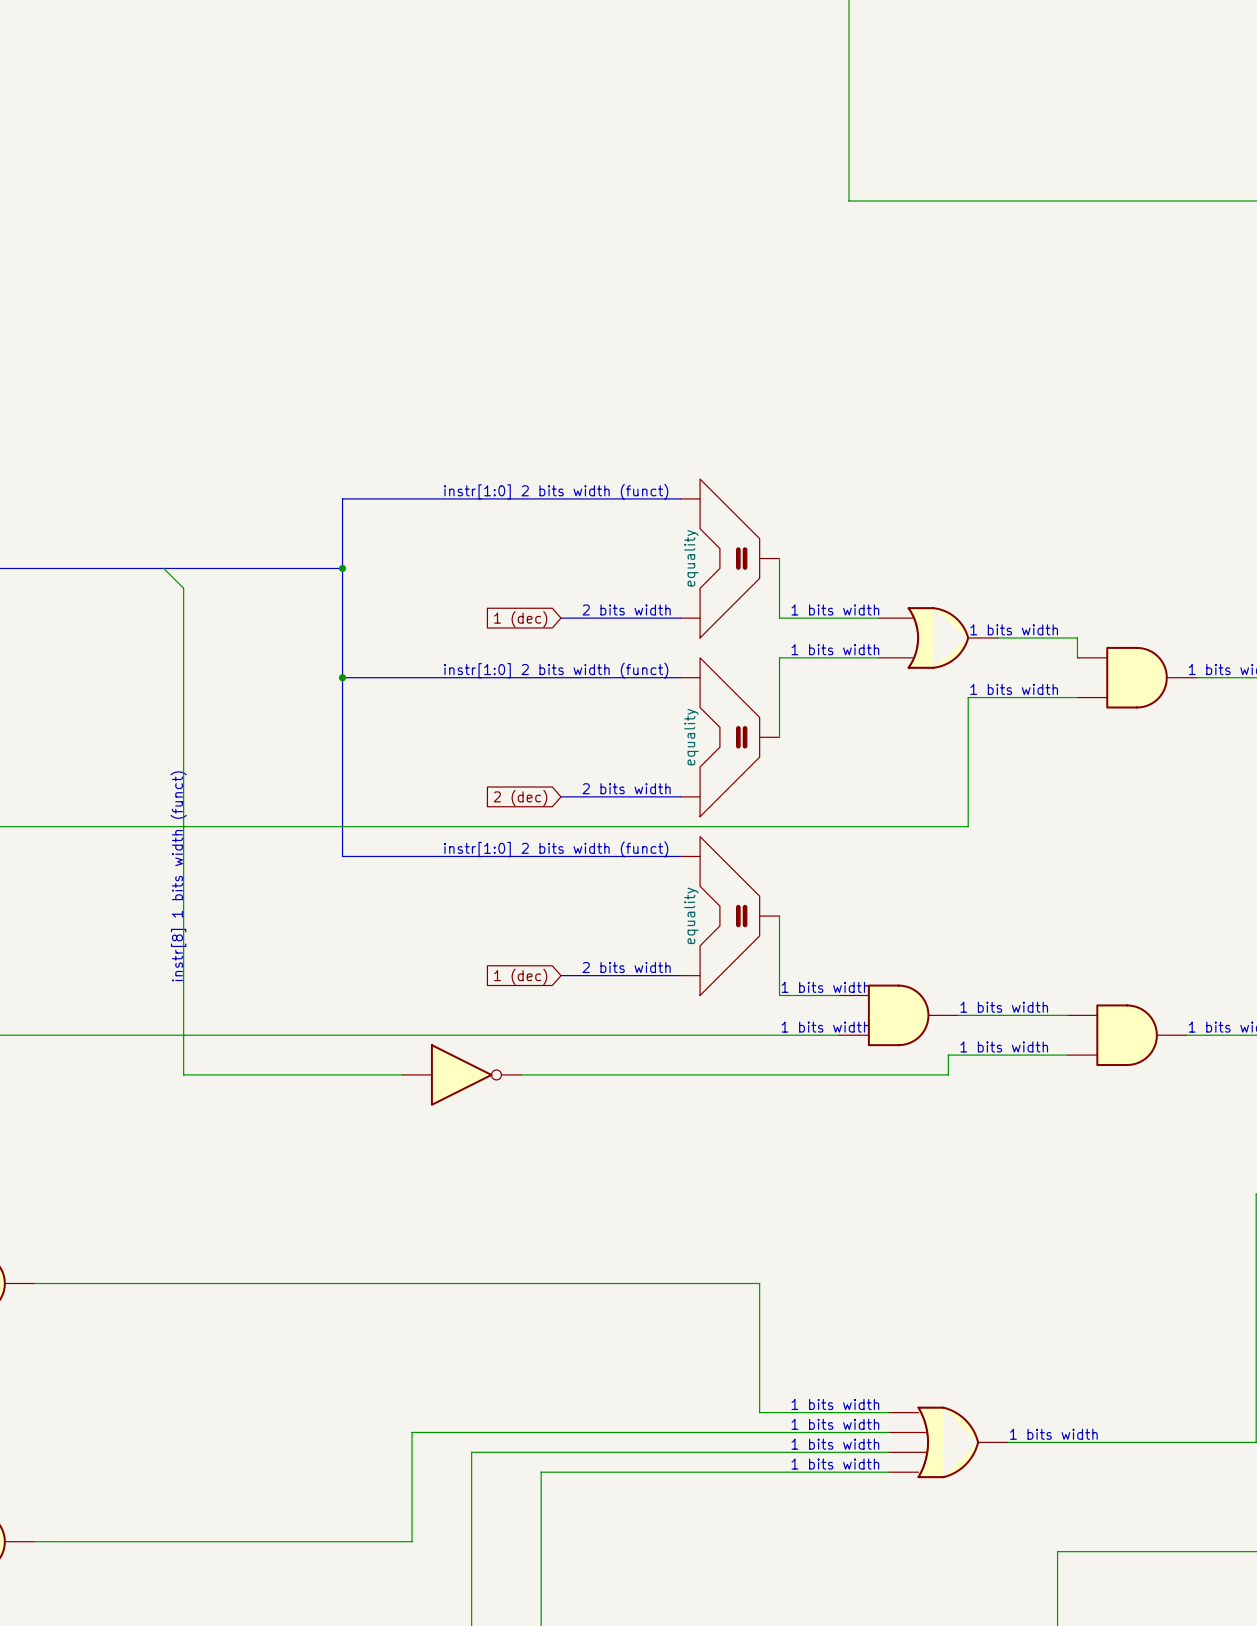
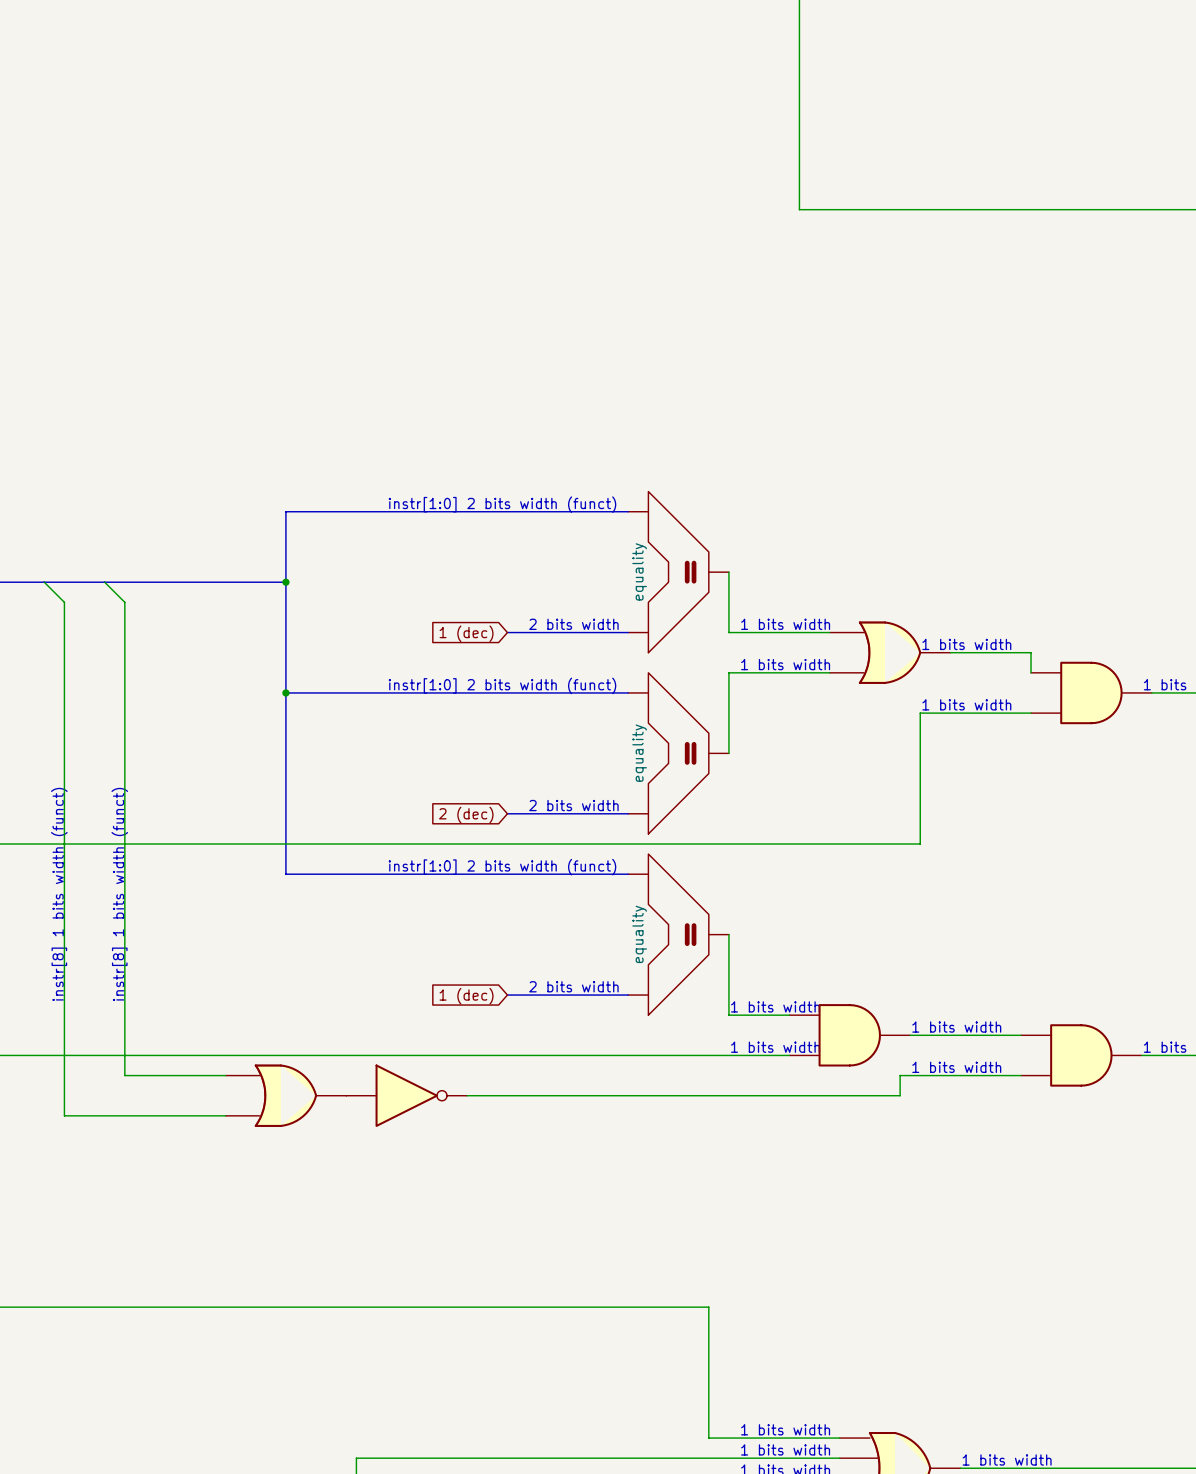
wire: none -> (44, 582) (64, 602) (64, 1115) (225, 1115)
text: none -> instr[8] 1 bits width (funct) (59, 894)
wire: (183, 1055) (183, 1074) (402, 1074) -> (124, 1075) (225, 1075)
part: none -> (285, 1095)

